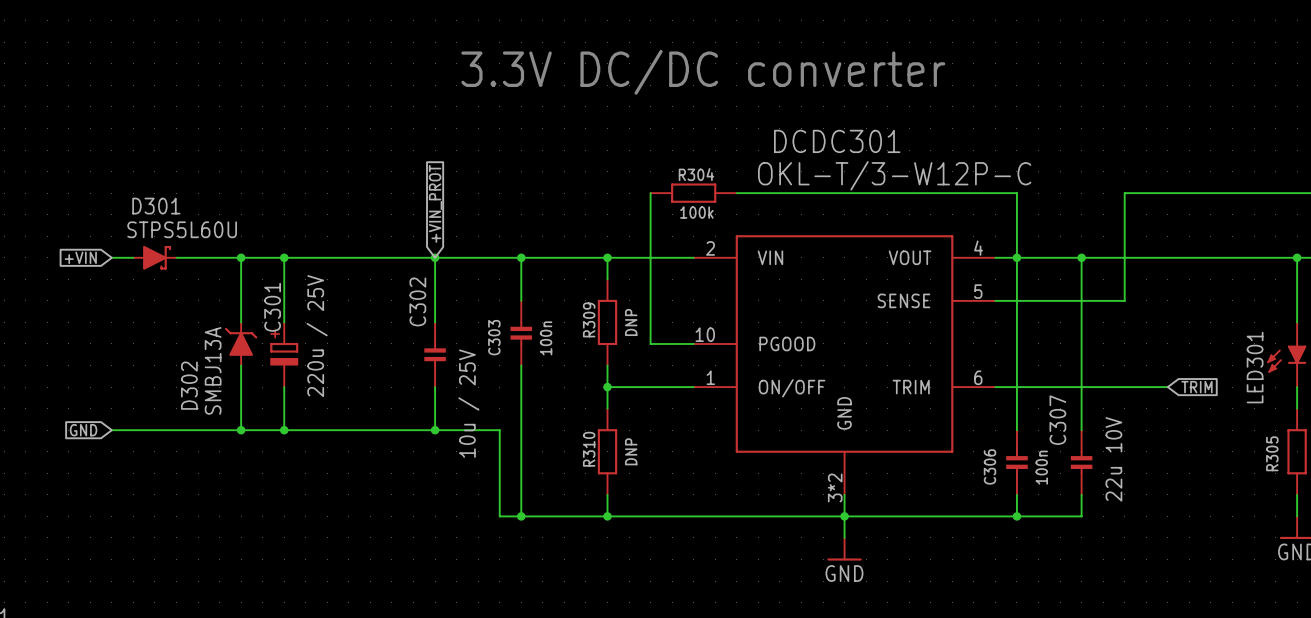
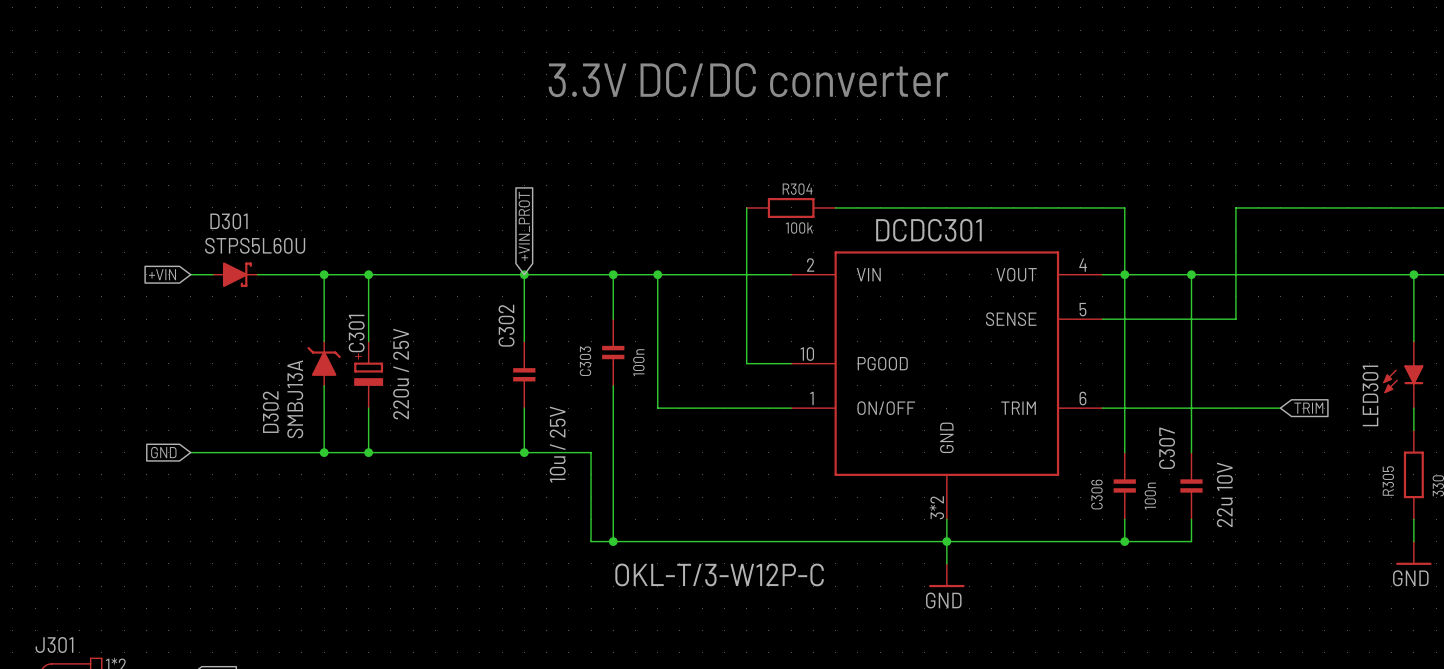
DCDC301 name position: DCDC301 (837, 141) -> DCDC301 (928, 230)
DCDC301 value position: OKL-T/3-W12P-C (894, 175) -> OKL-T/3-W12P-C (719, 574)
wire: none -> (657, 274) (657, 408) (702, 408)
wire: (607, 257) (607, 279) -> none
junction position: (607, 257) -> (657, 274)
R309: DNP (607, 322) -> none
wire: (607, 365) (607, 408) -> none
junction: (607, 387) -> none
R310: DNP (607, 451) -> none
wire: (607, 494) (607, 516) -> none
junction: (607, 516) -> none

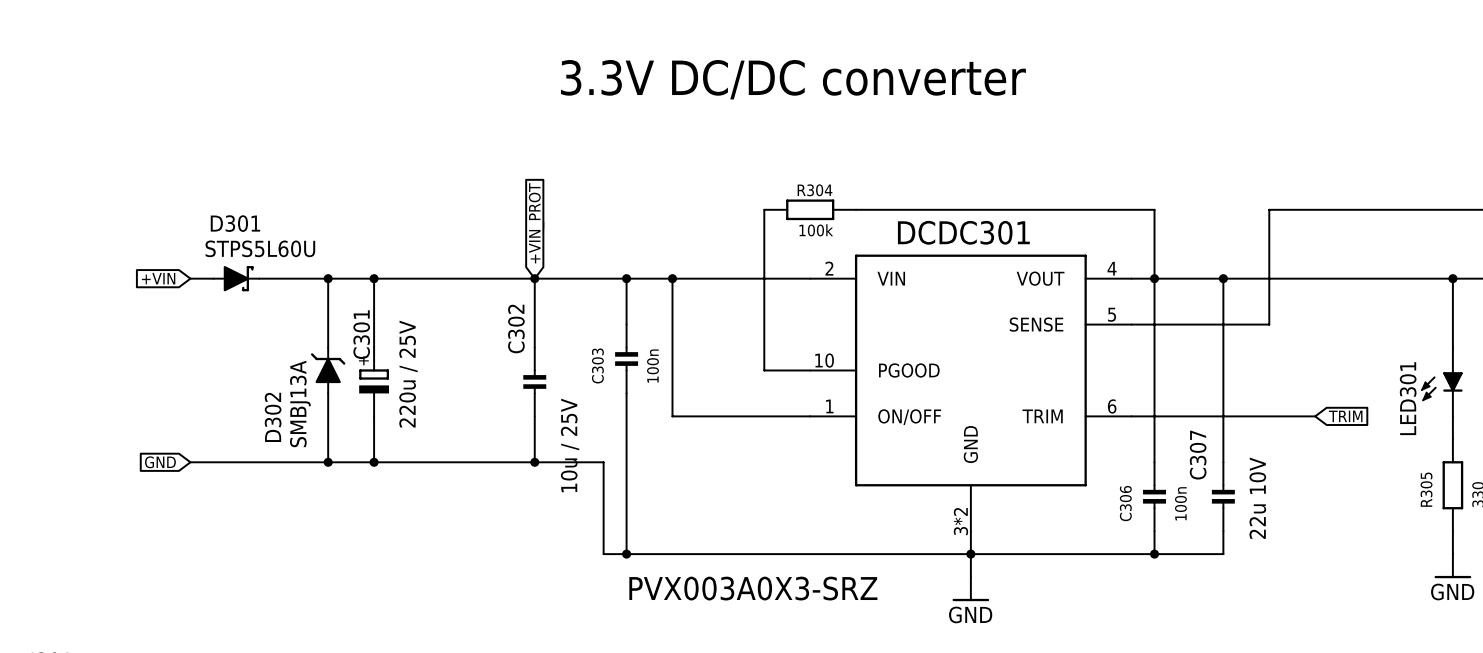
DCDC301 value: OKL-T/3-W12P-C (719, 574) -> PVX003A0X3-SRZ (753, 588)

